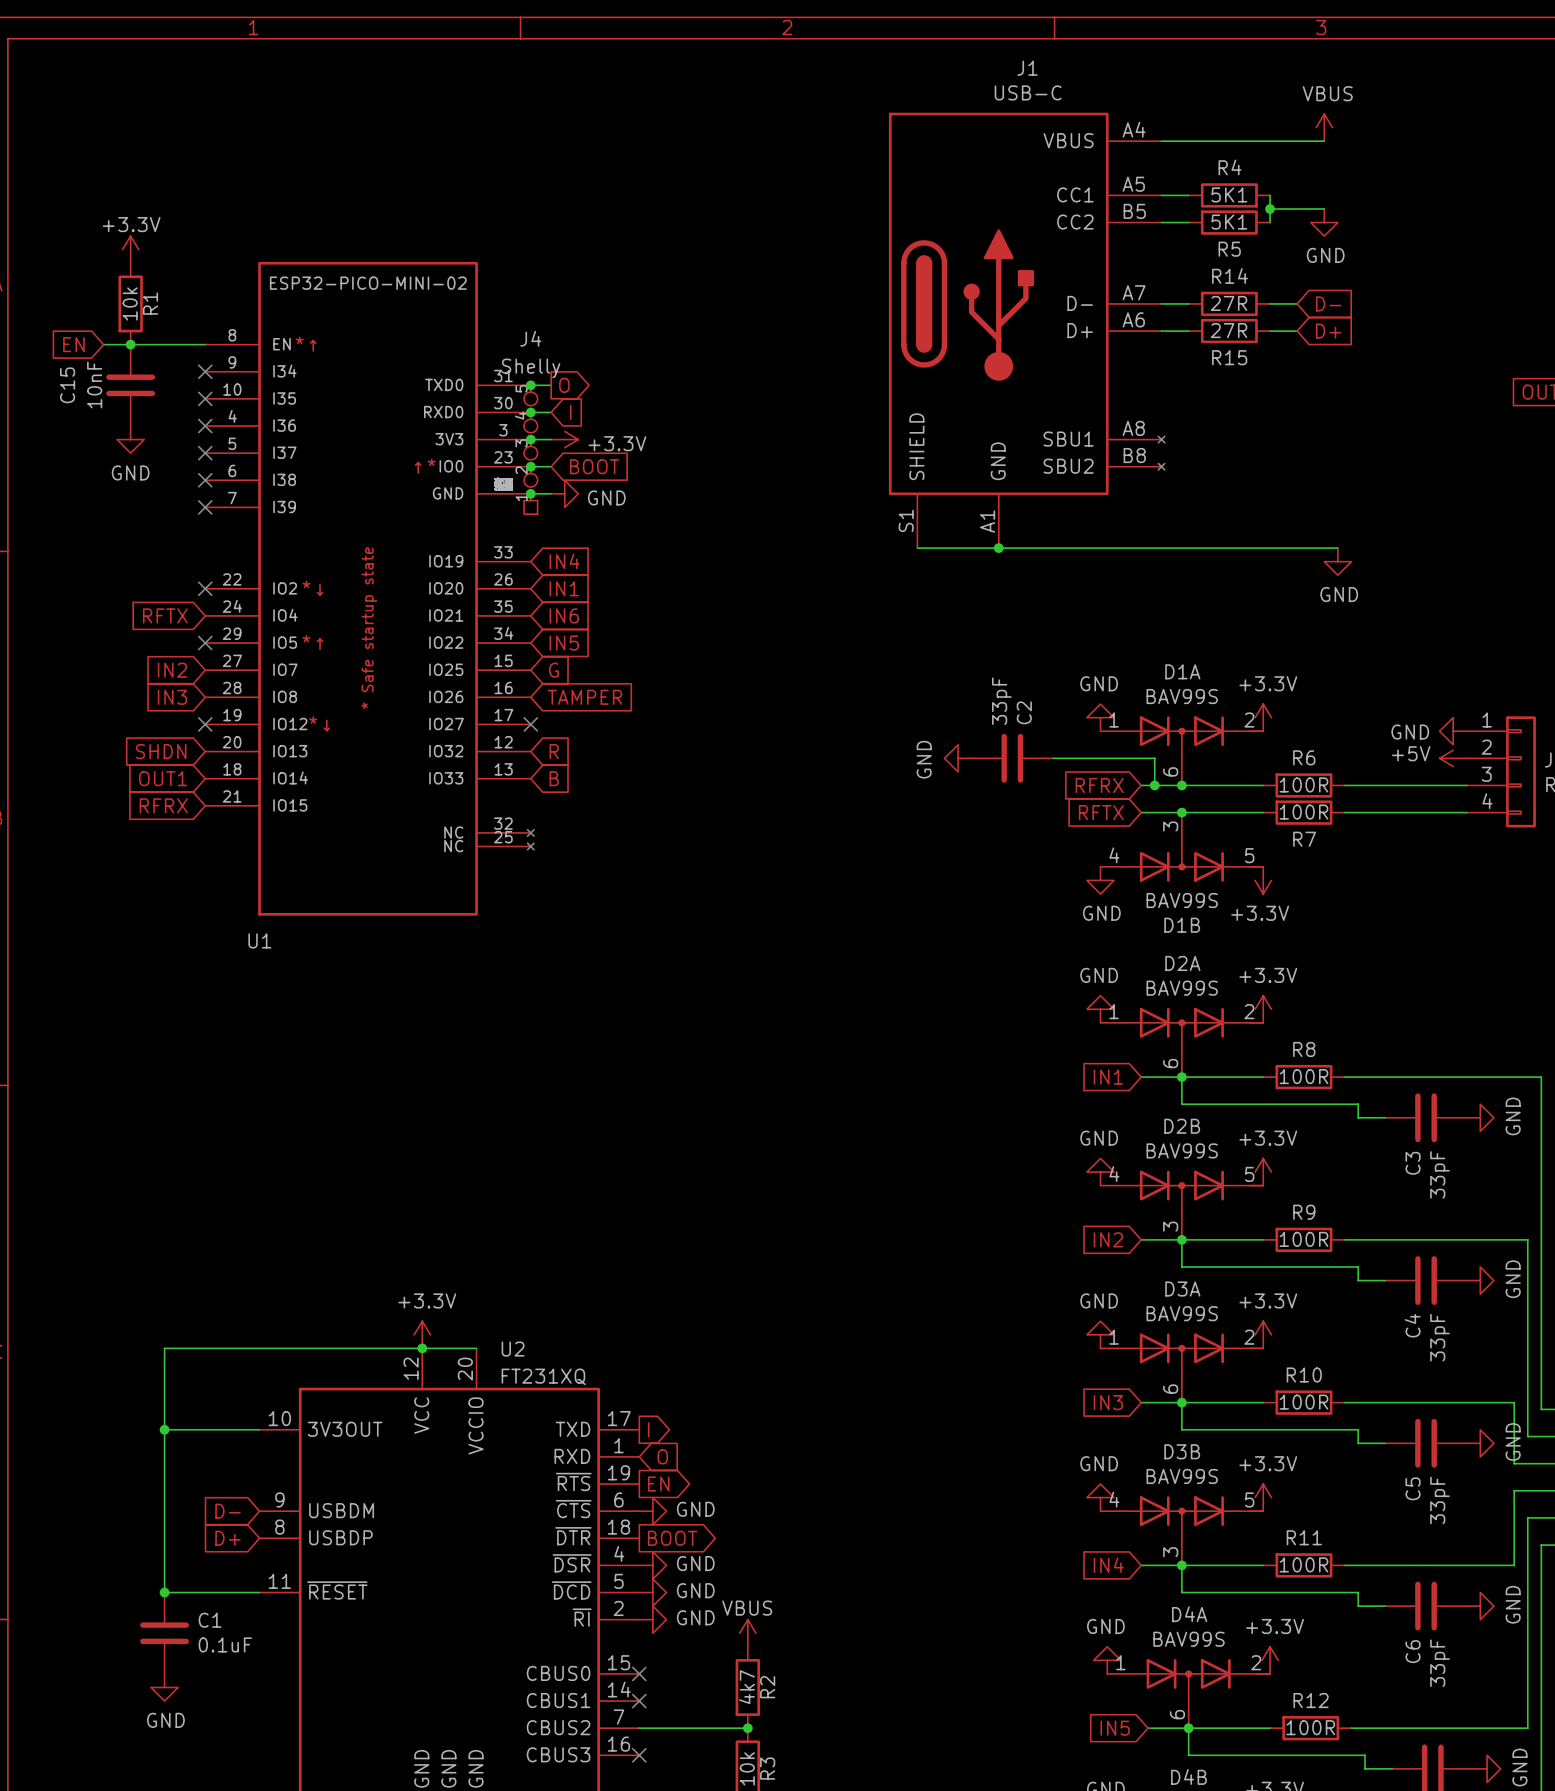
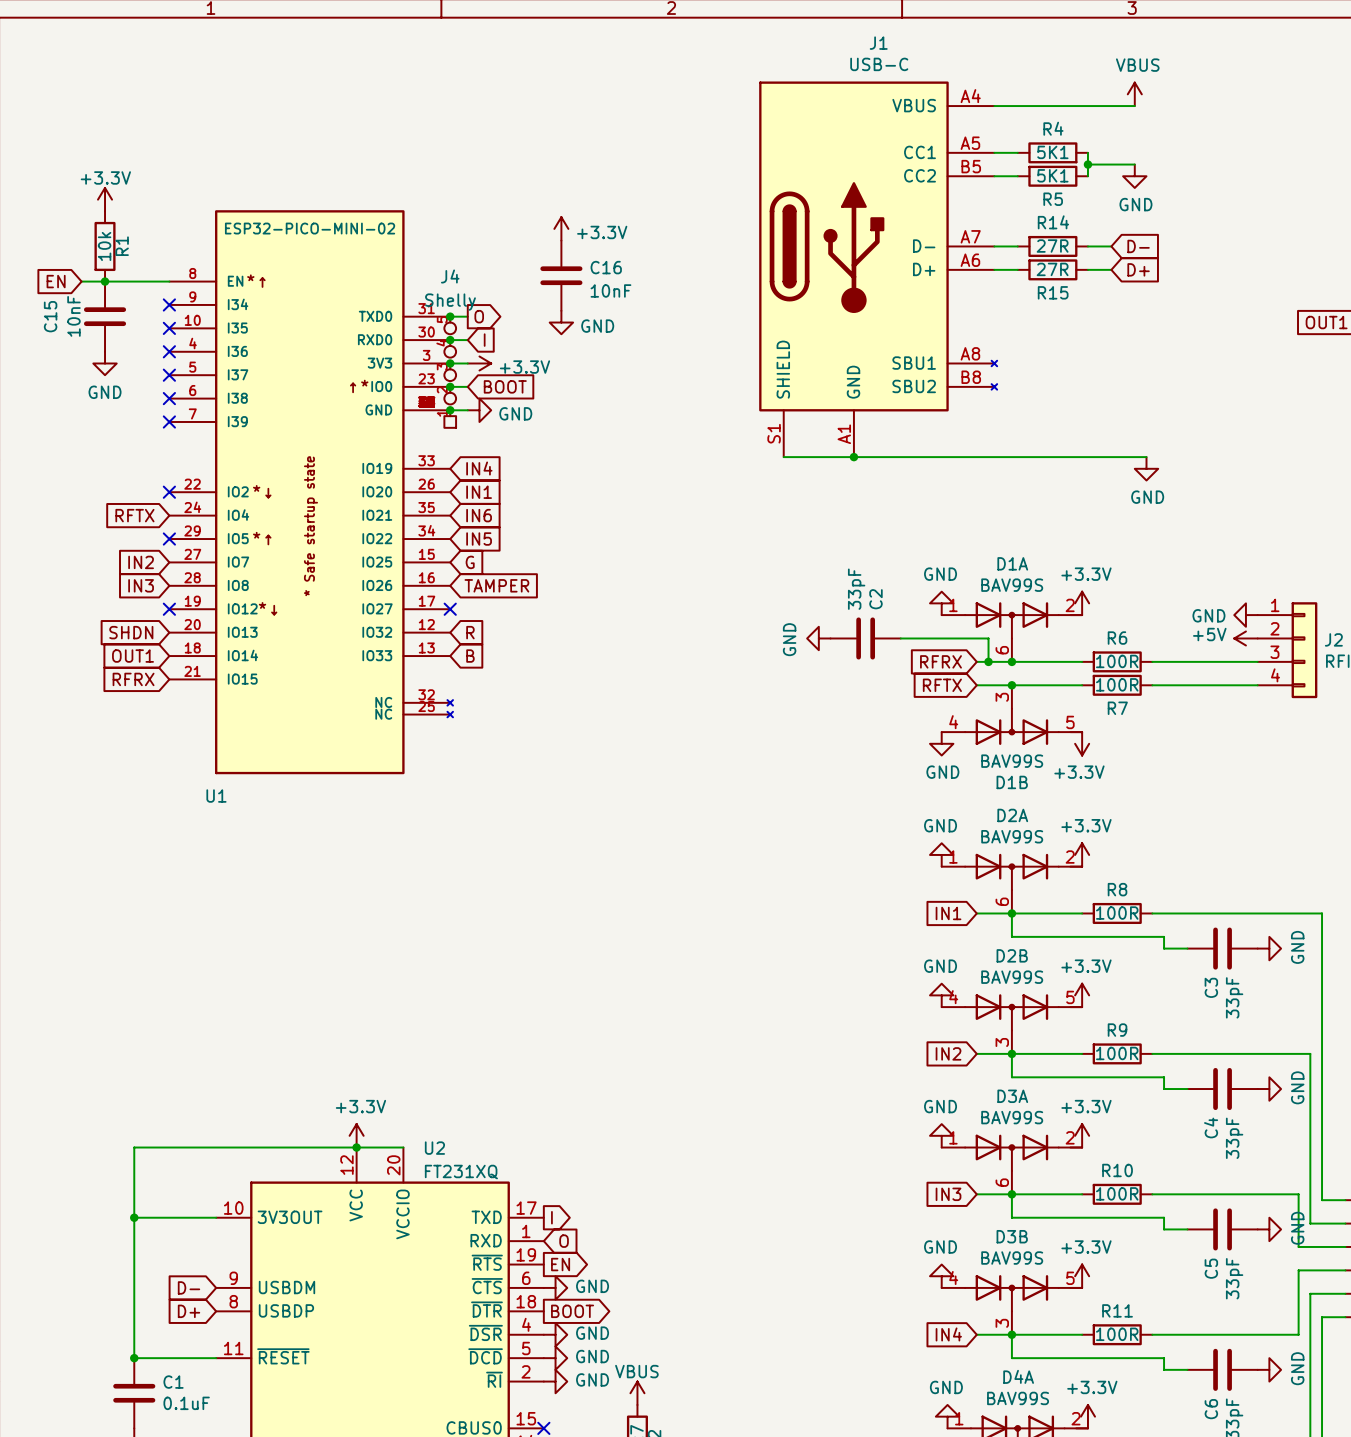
power symbol: none -> +3.3V (561, 228)
C16: none -> 10nF (561, 275)
power symbol: none -> GND (561, 322)

